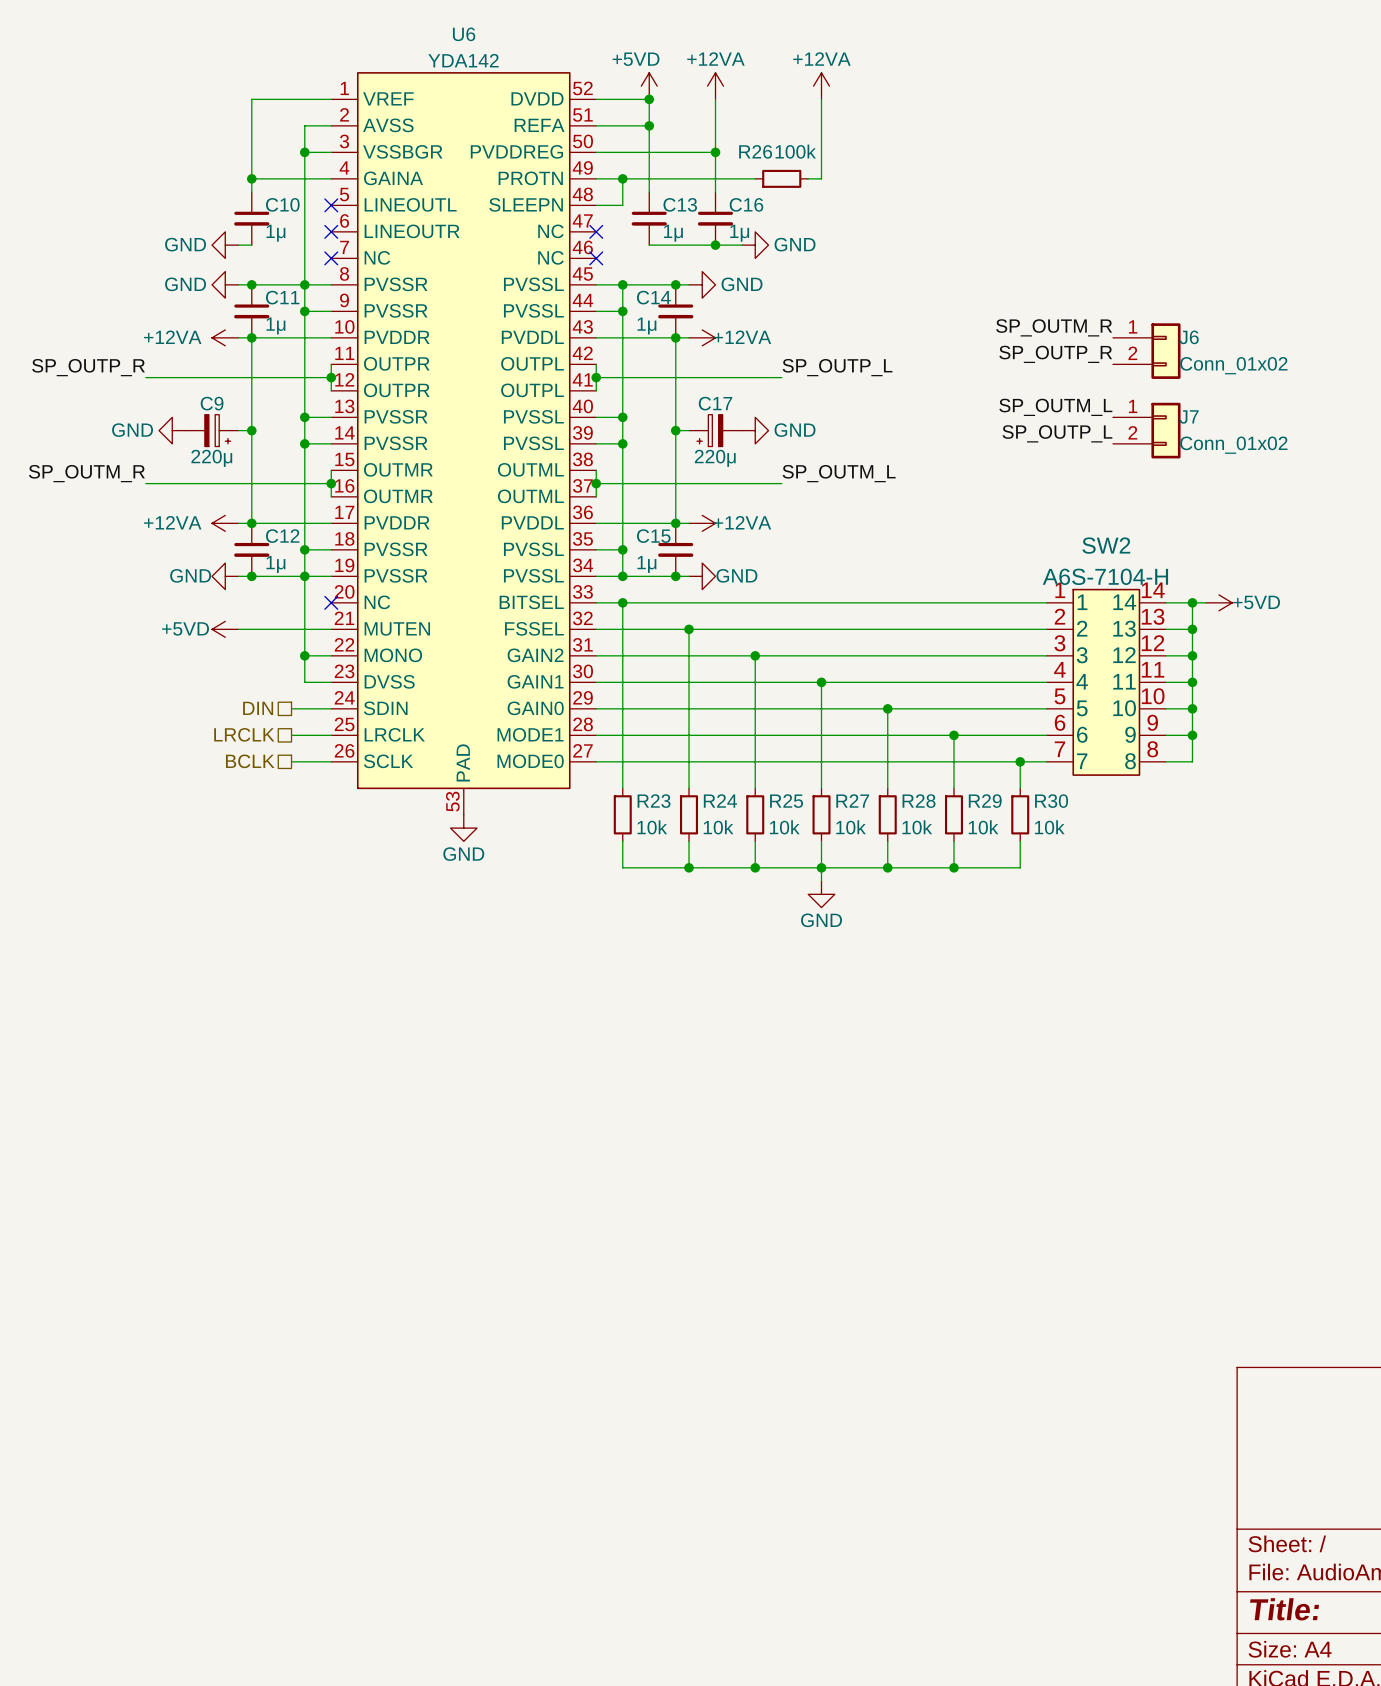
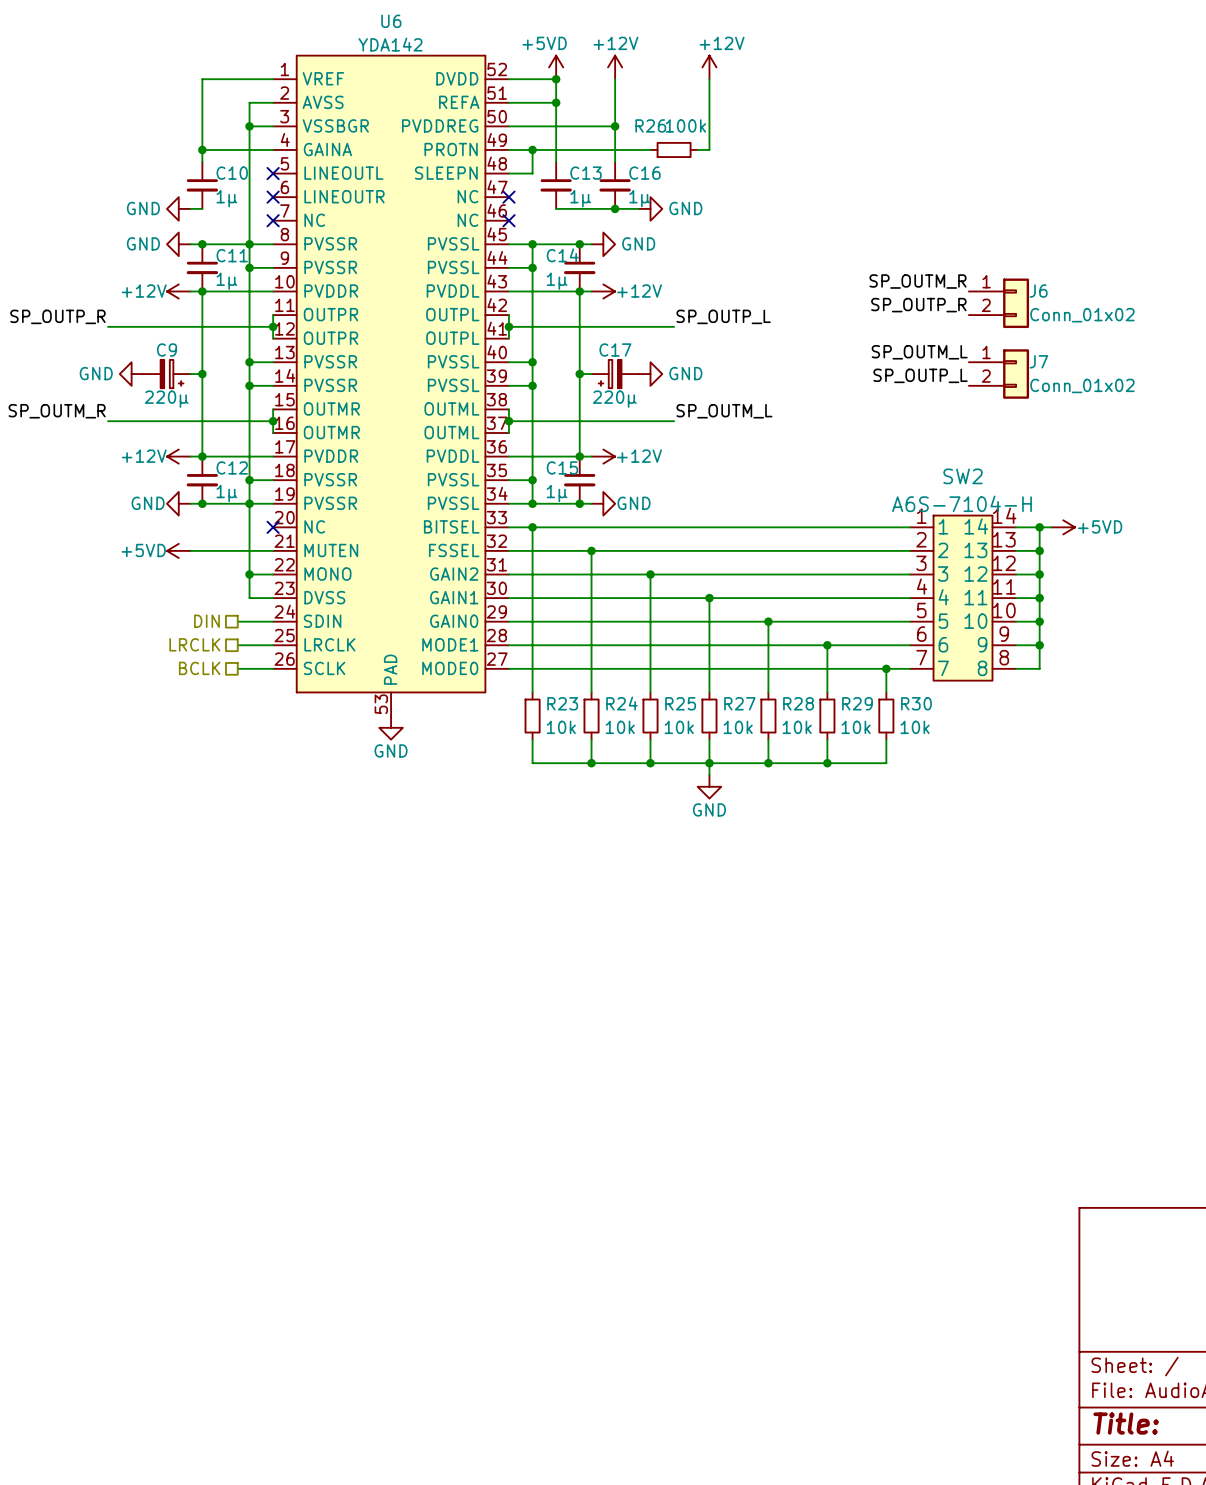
power symbol: +12VA (715, 86) -> +12V (615, 67)
power symbol: +12VA (821, 86) -> +12V (709, 67)
power symbol: +12VA (225, 337) -> +12V (178, 291)
power symbol: +12VA (702, 337) -> +12V (603, 291)
power symbol: +12VA (225, 523) -> +12V (178, 456)
power symbol: +12VA (702, 523) -> +12V (603, 456)

